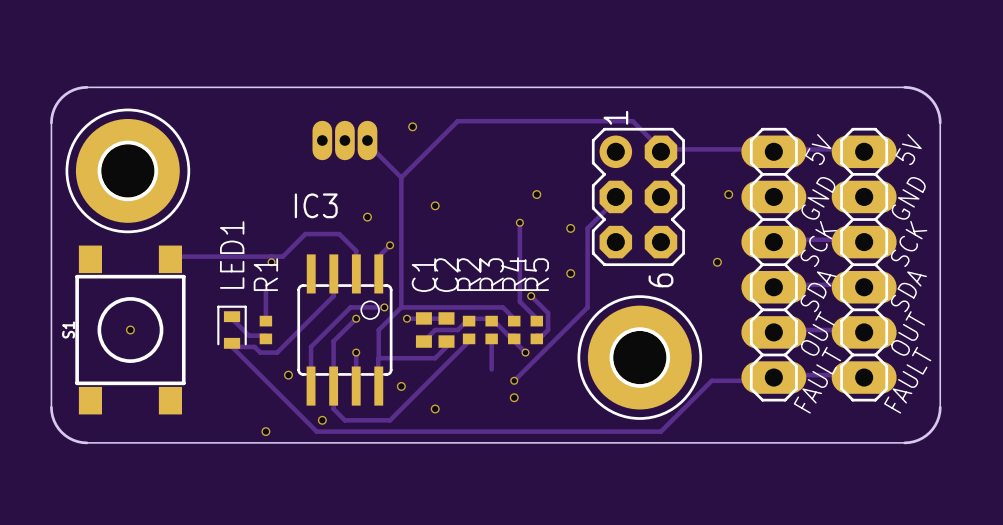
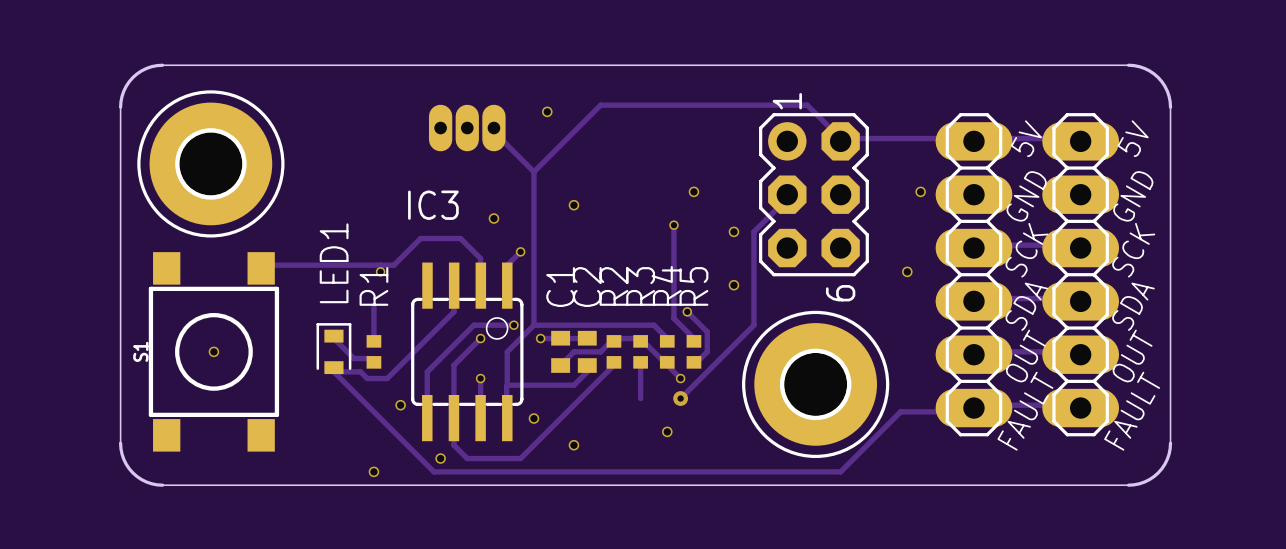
track: (525, 369) (514, 380) -> none
via: none -> (680, 398)
via: (514, 380) -> none

